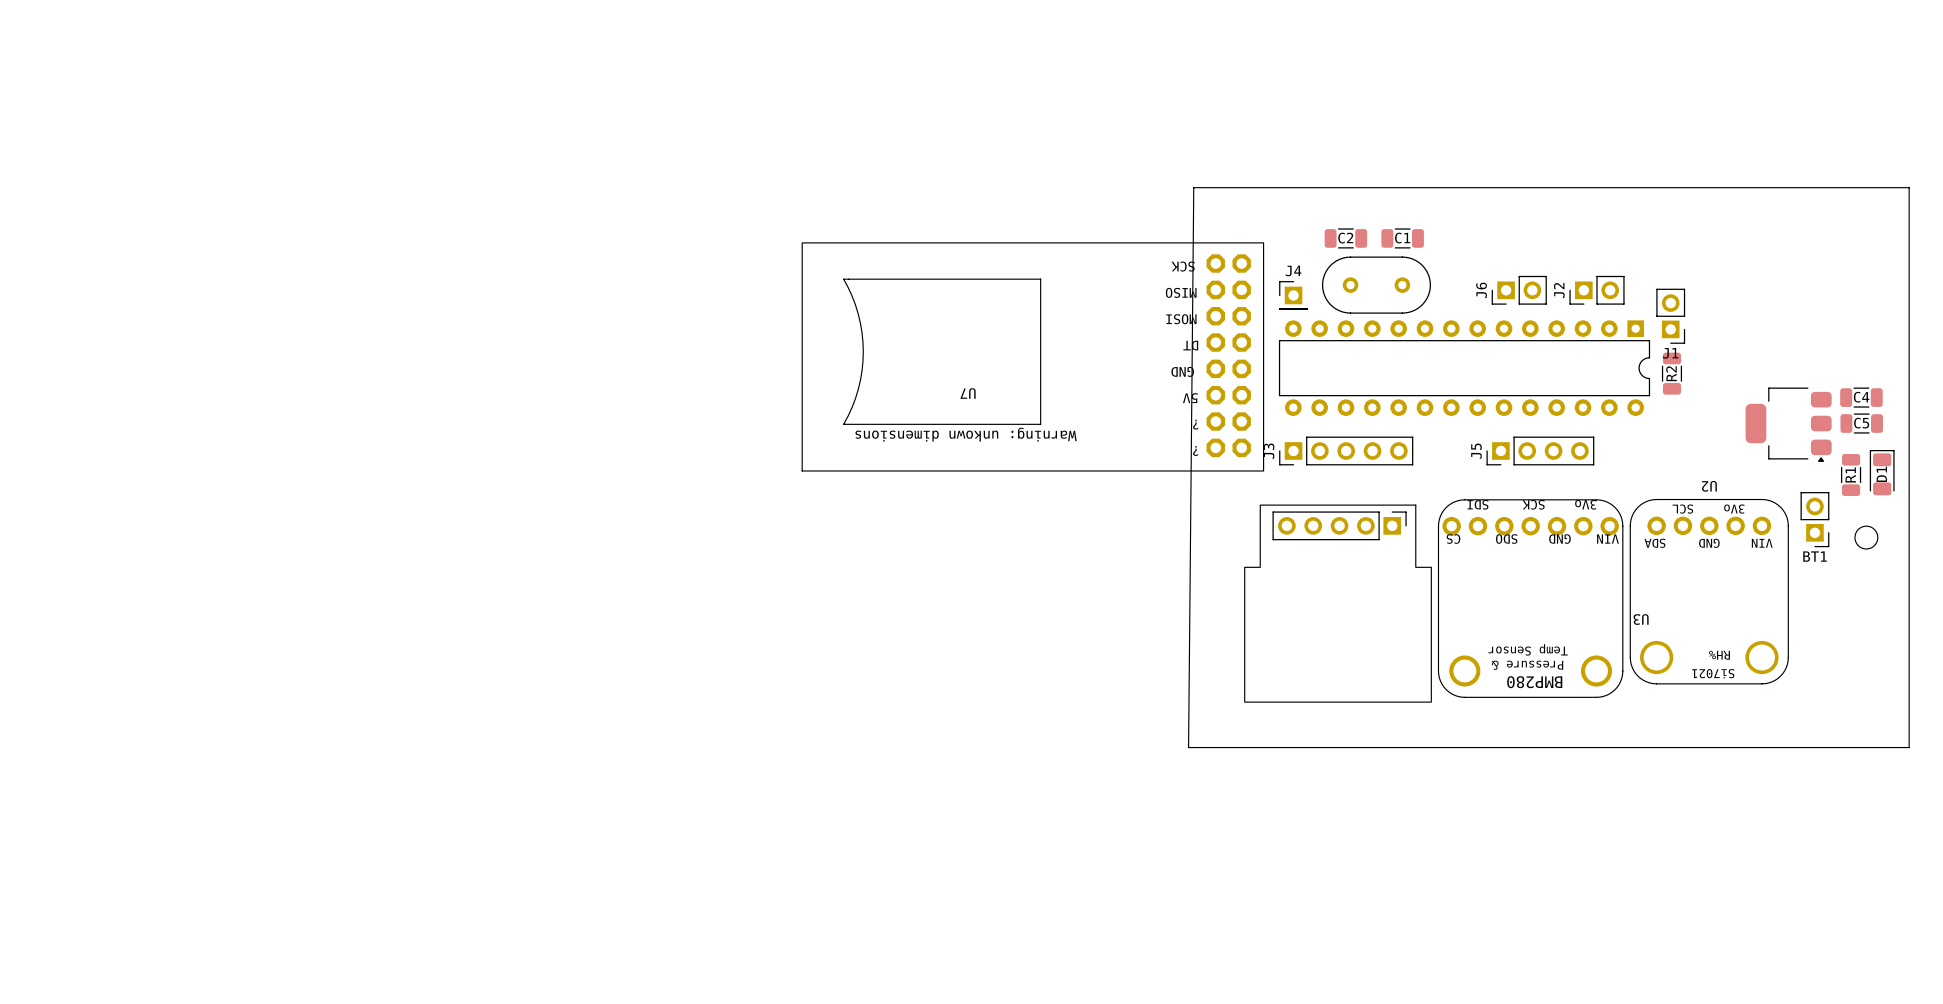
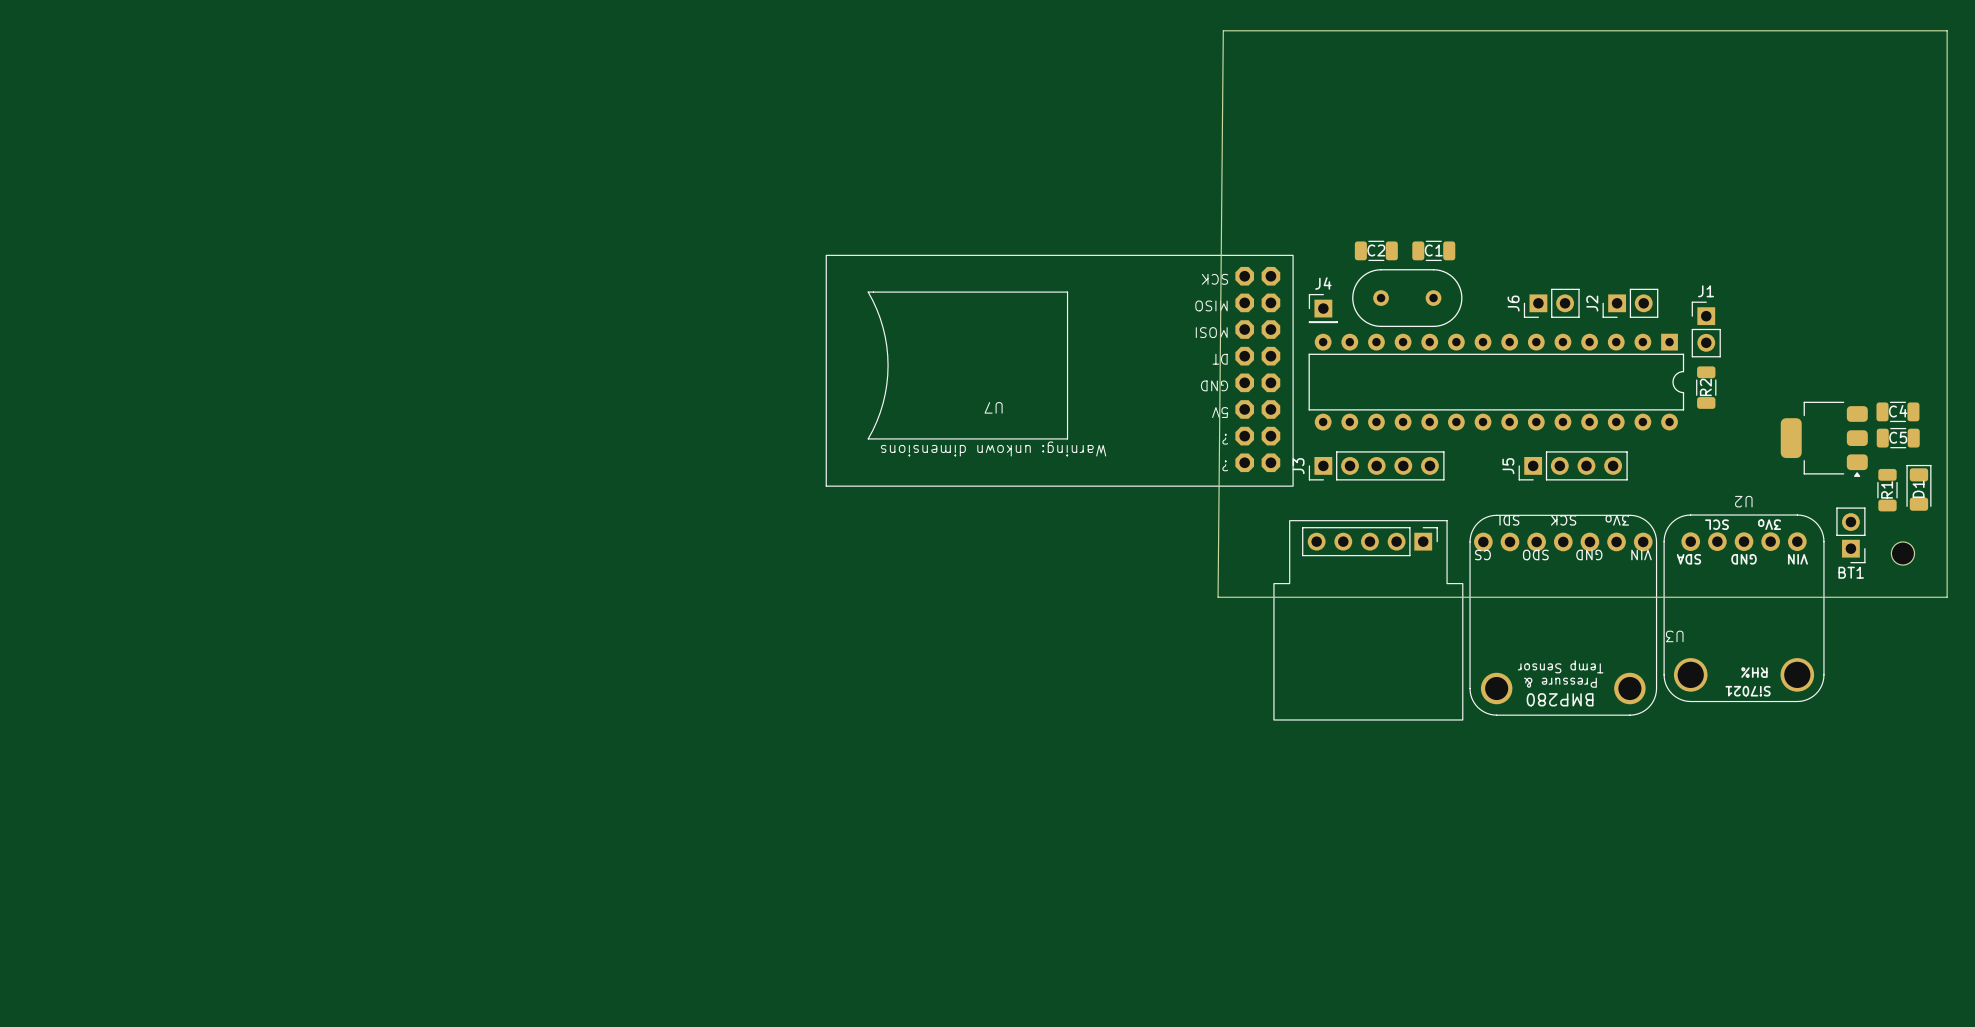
board edge: (1193, 187) (1188, 747) (1909, 747) (1909, 187) (1193, 187) -> (1223, 30) (1218, 597) (1947, 597) (1947, 30) (1223, 30)
J1 rotation: 0° (1670, 316) -> 180° (1706, 329)

